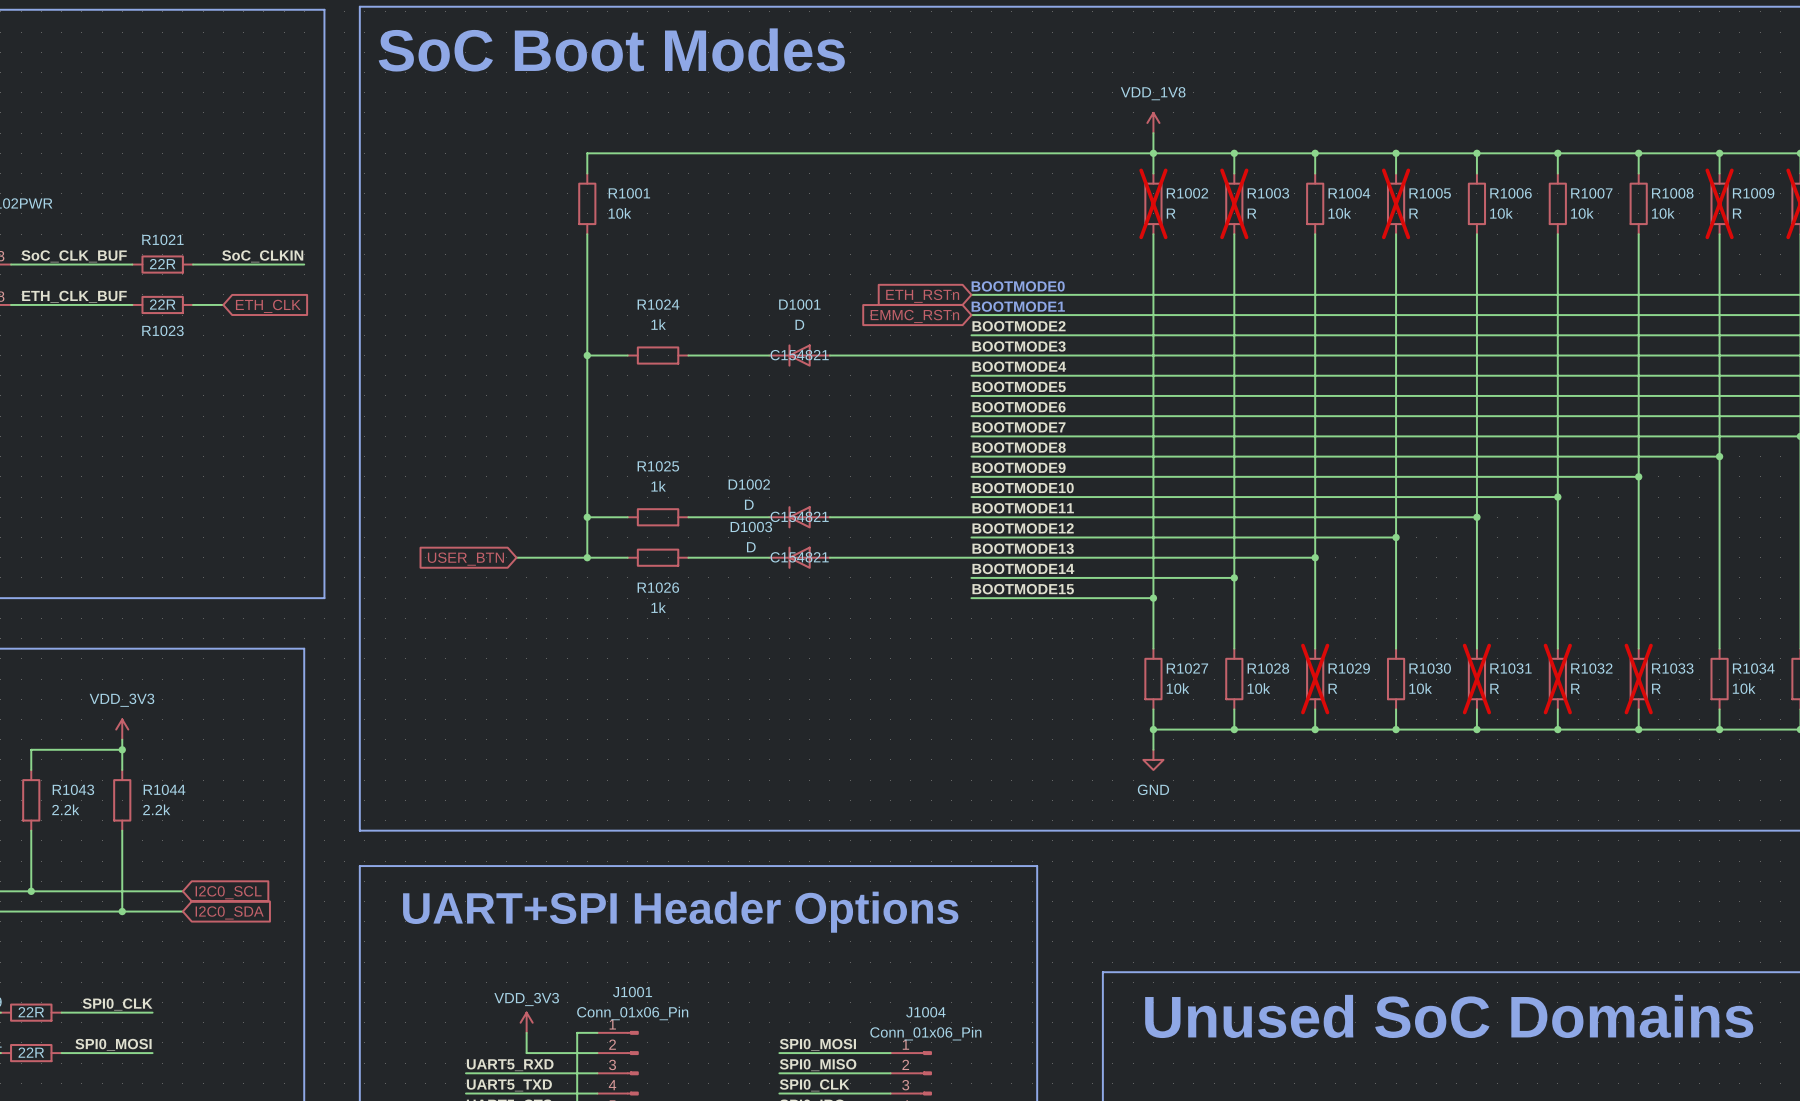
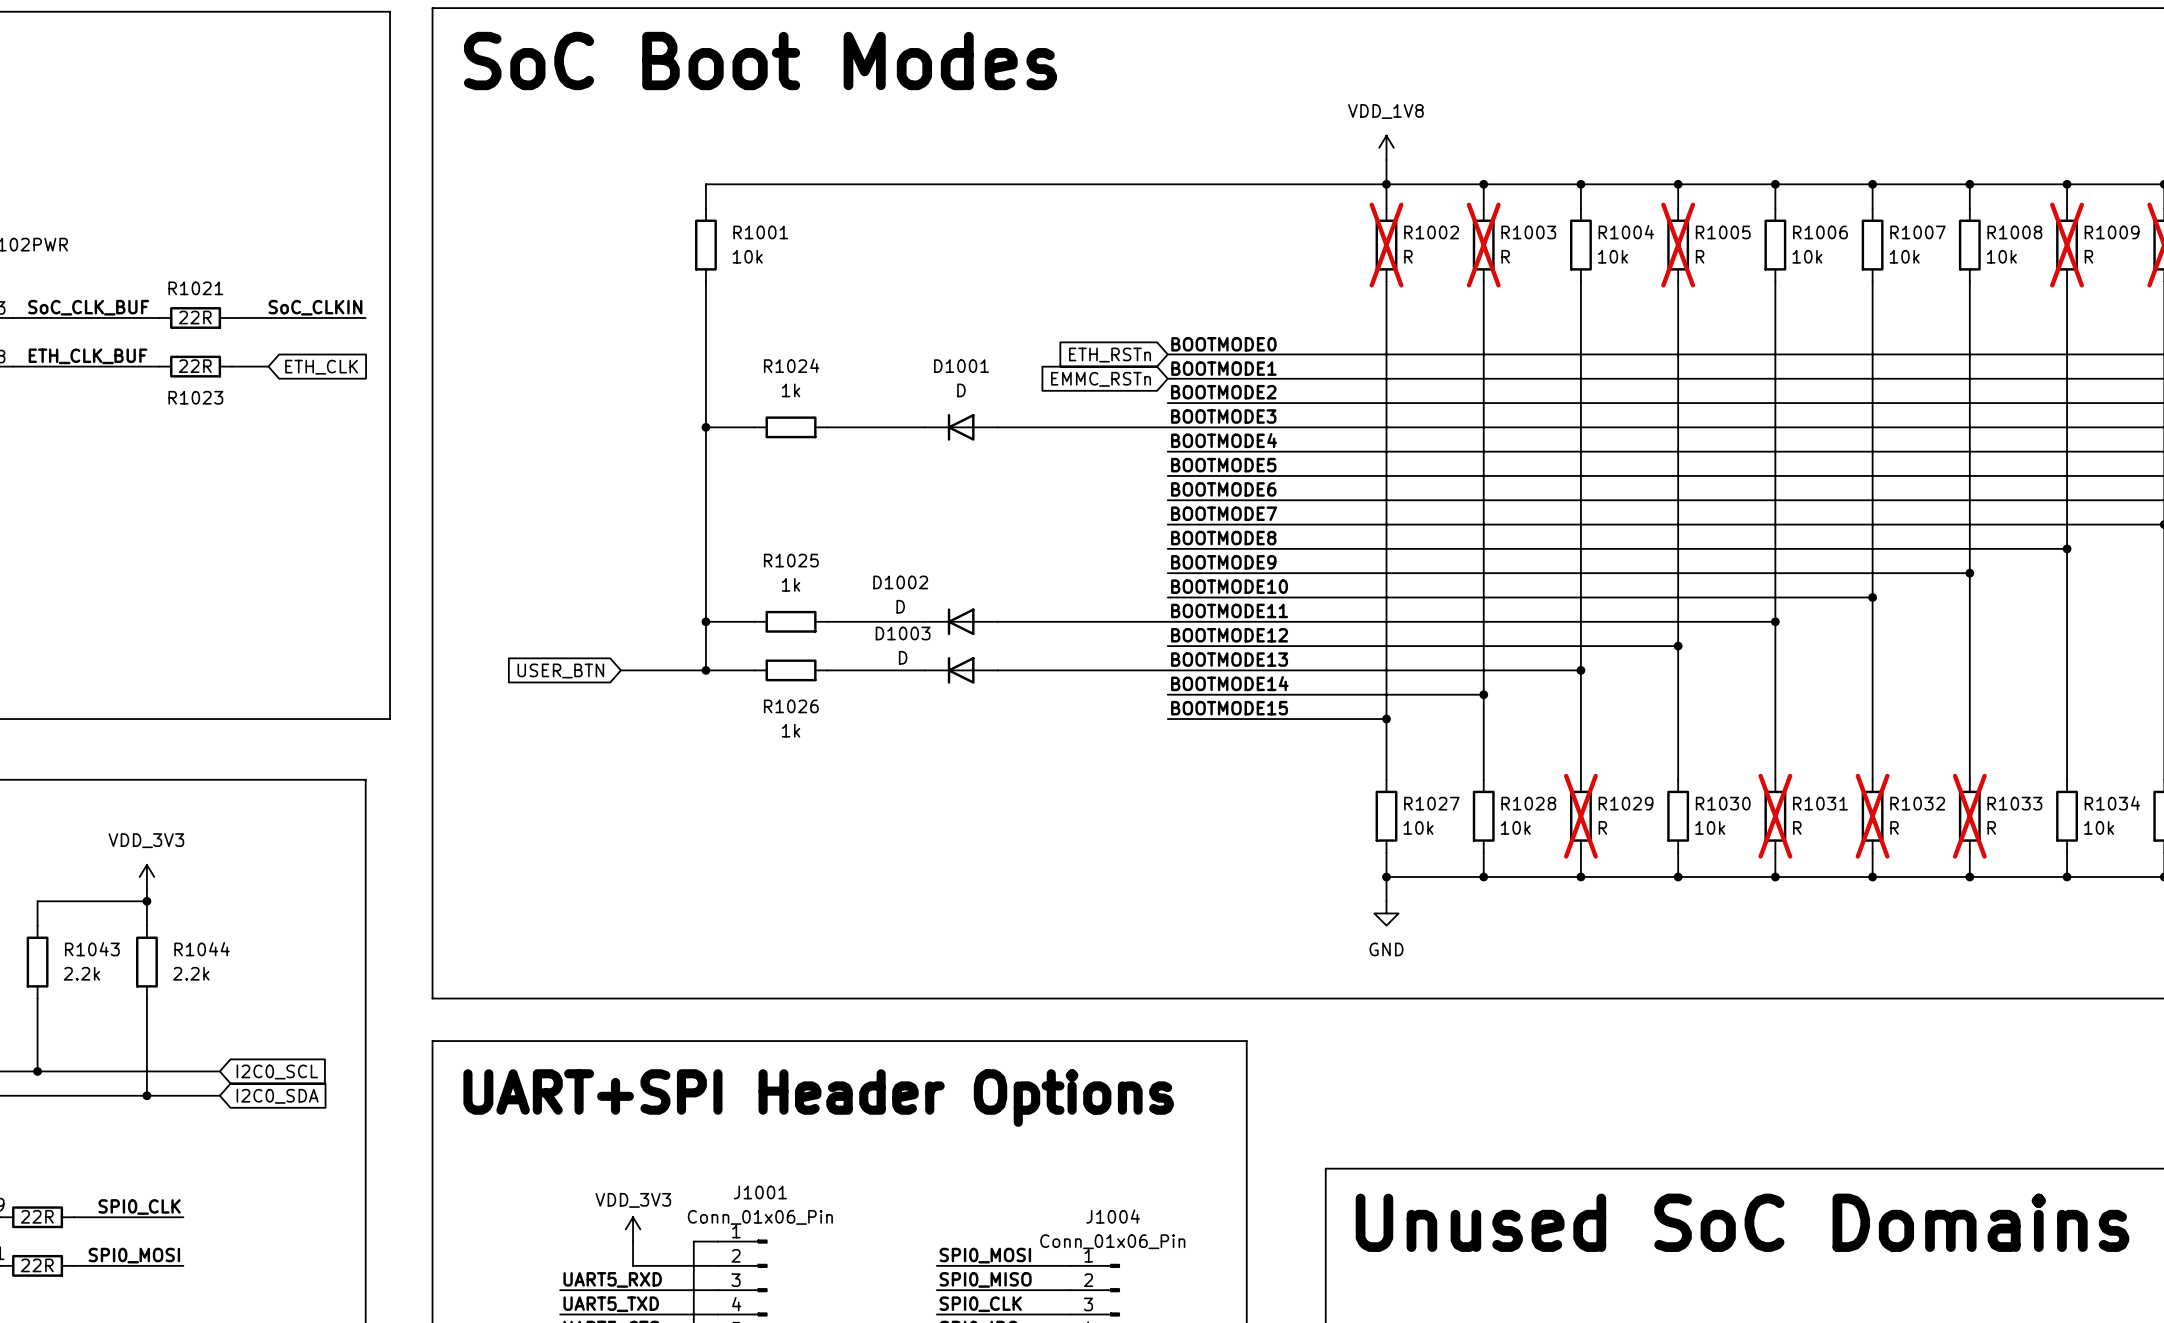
D1001 text: C154821 (799, 355) -> none
D1002 text: C154821 (799, 516) -> none
D1003 text: C154821 (799, 557) -> none

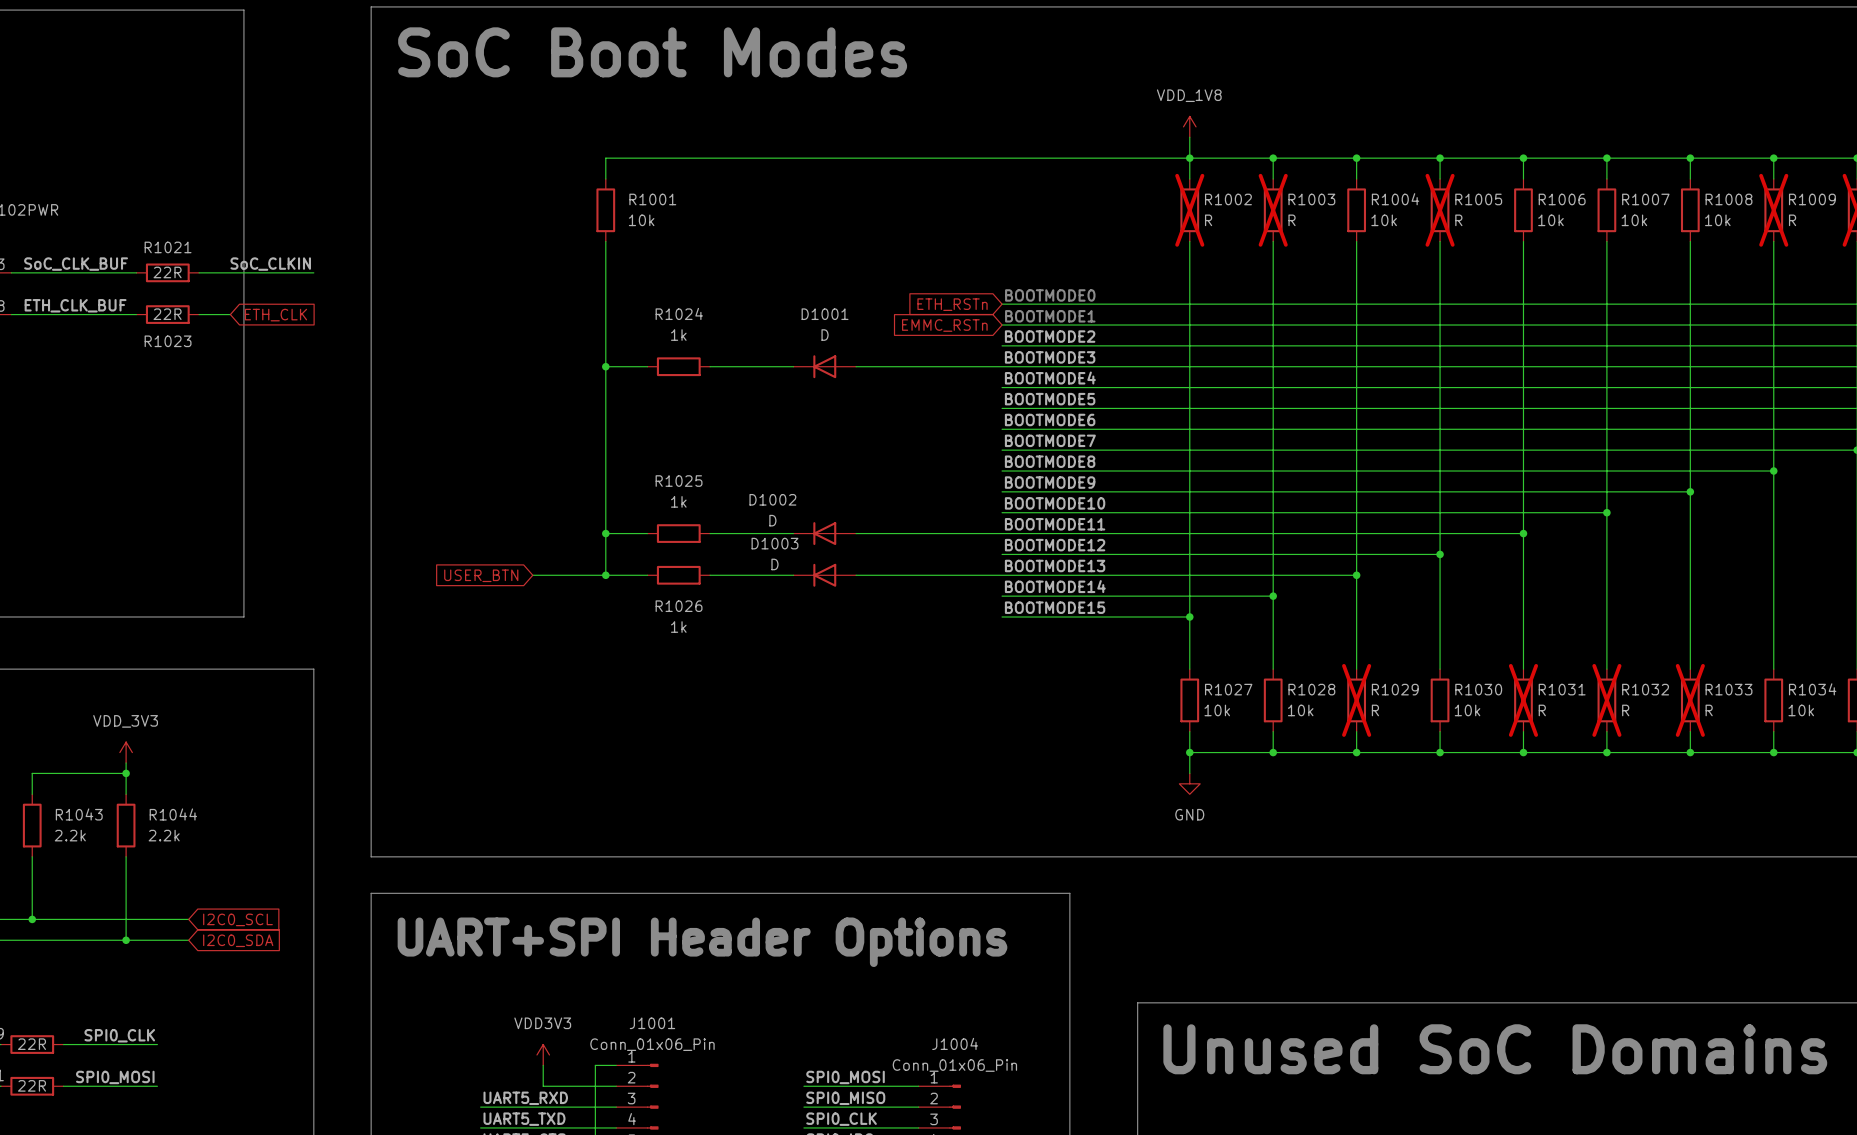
line: (284, 11) (390, 11) (390, 719) (284, 719) -> (243, 10) (243, 616)
power symbol: VDD_3V3 (633, 1229) -> VDD3V3 (543, 1054)

